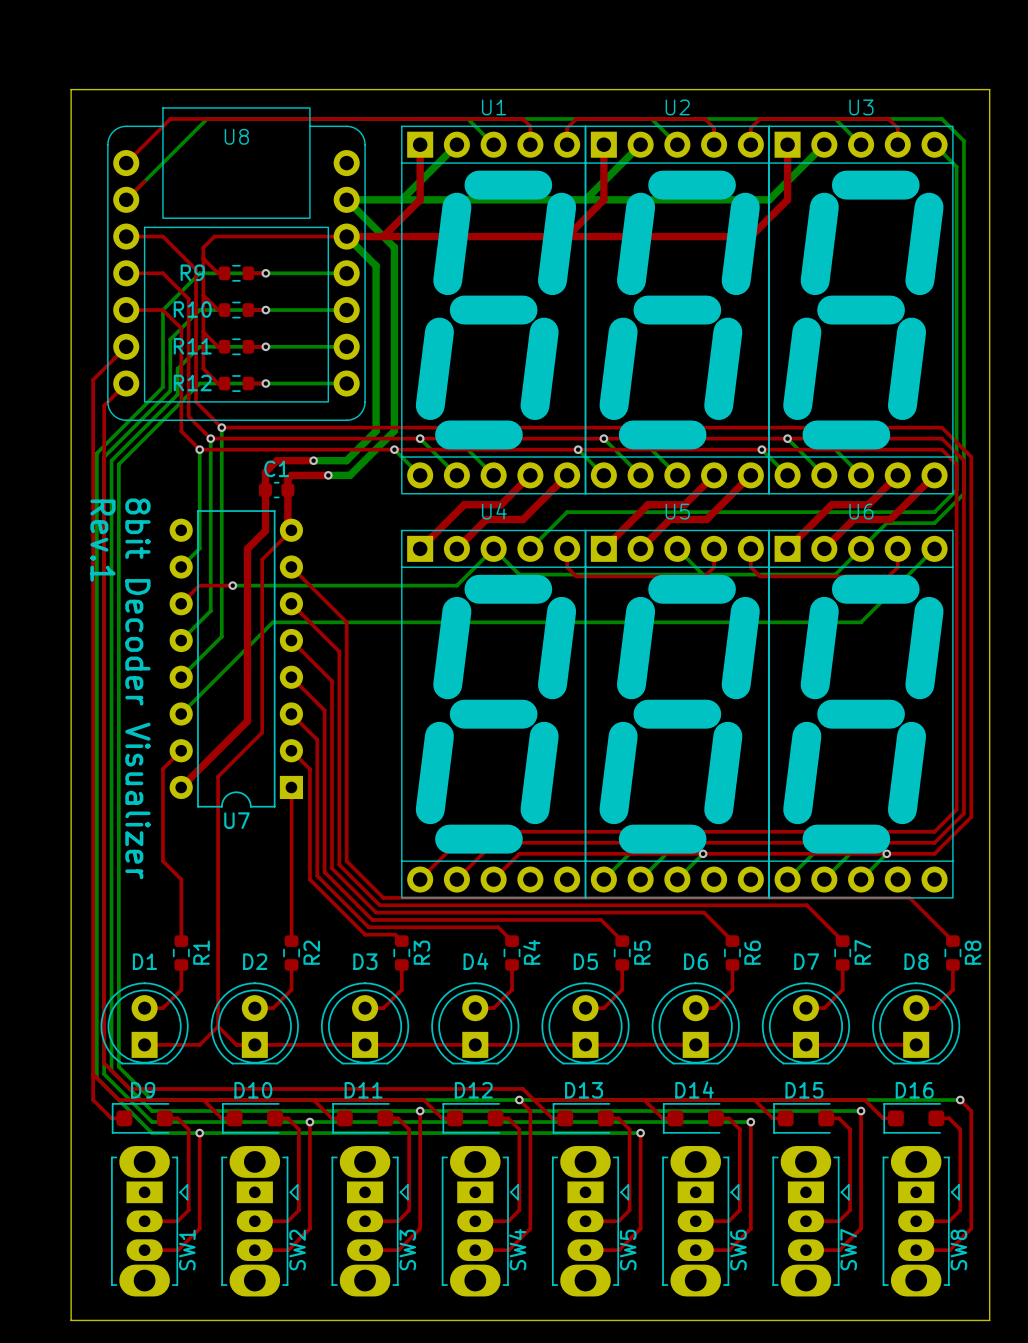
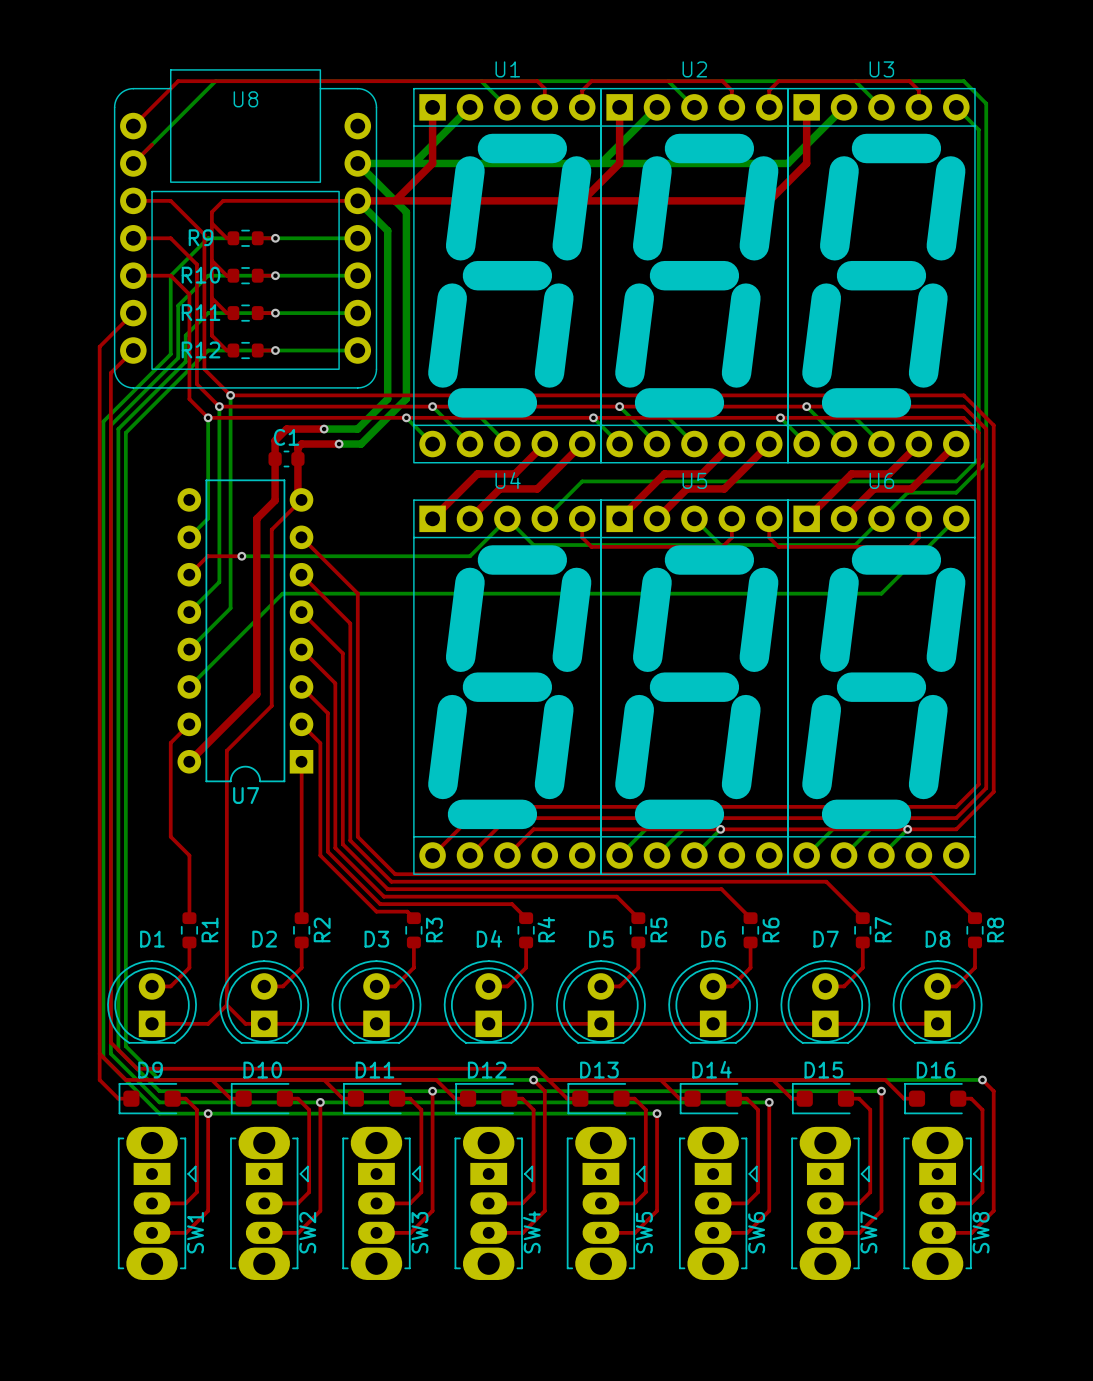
board edge: (71, 89) (989, 89) (989, 1320) (71, 1320) (71, 89) -> none
text: Rev.1 (103, 540) -> none
text: 8bit Decoder Visualizer (137, 688) -> none

